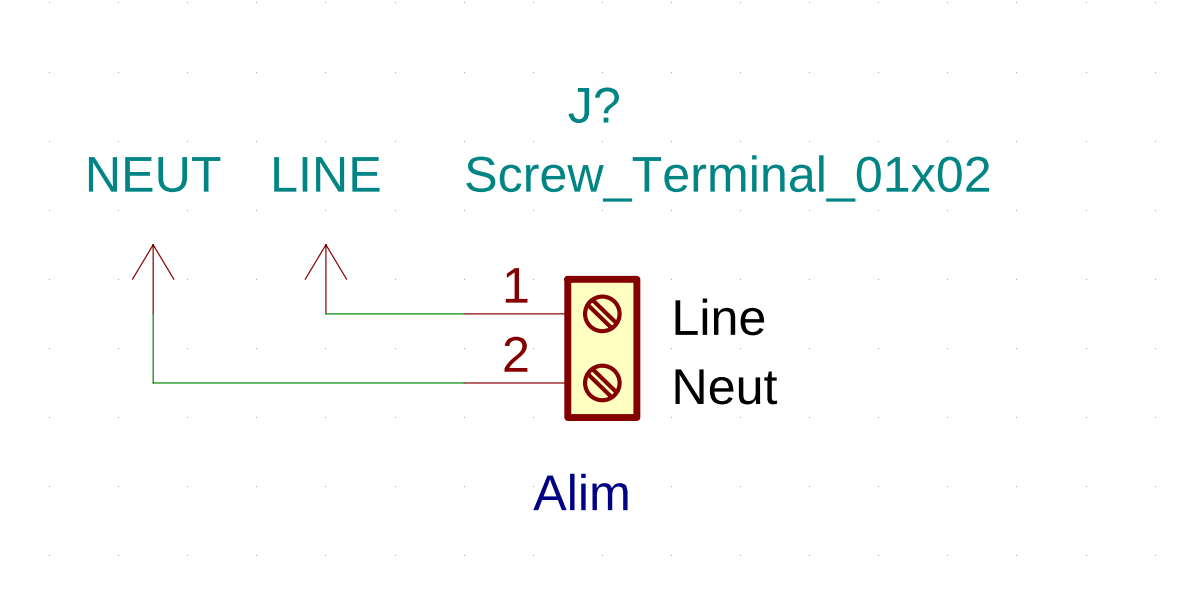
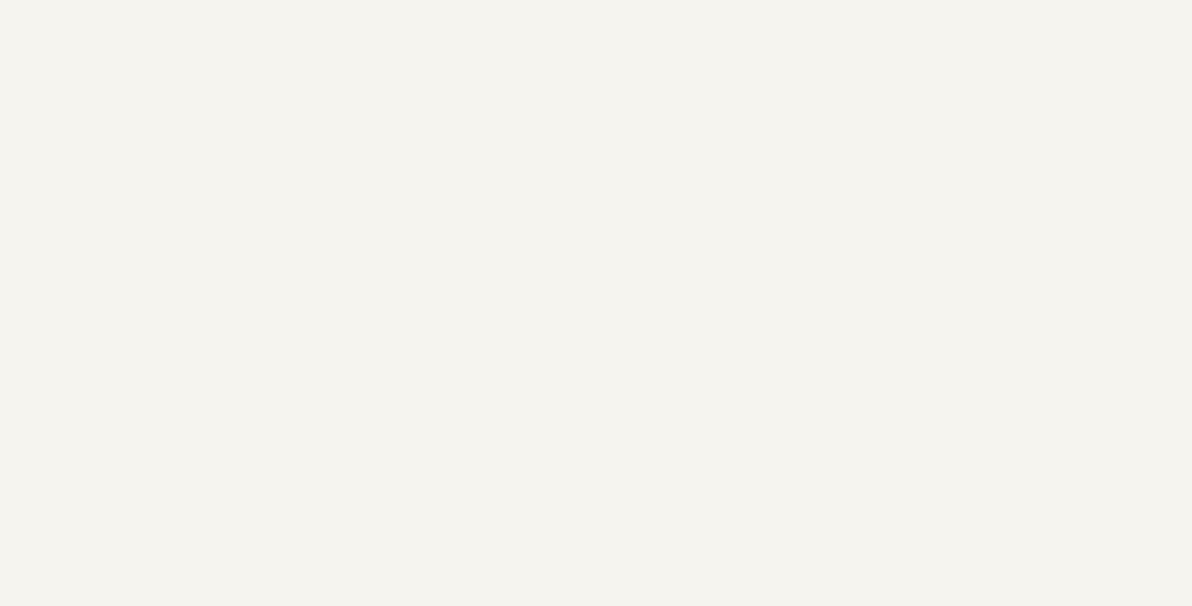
power symbol: NEUT (153, 279) -> none
power symbol: LINE (325, 279) -> none
wire: (153, 313) (153, 382) (464, 382) -> none
wire: (325, 313) (464, 313) -> none
label: Line (719, 316) -> none
J?: Screw_Terminal_01x02 (552, 348) -> none
label: Neut (726, 386) -> none
text: Alim (580, 491) -> none

